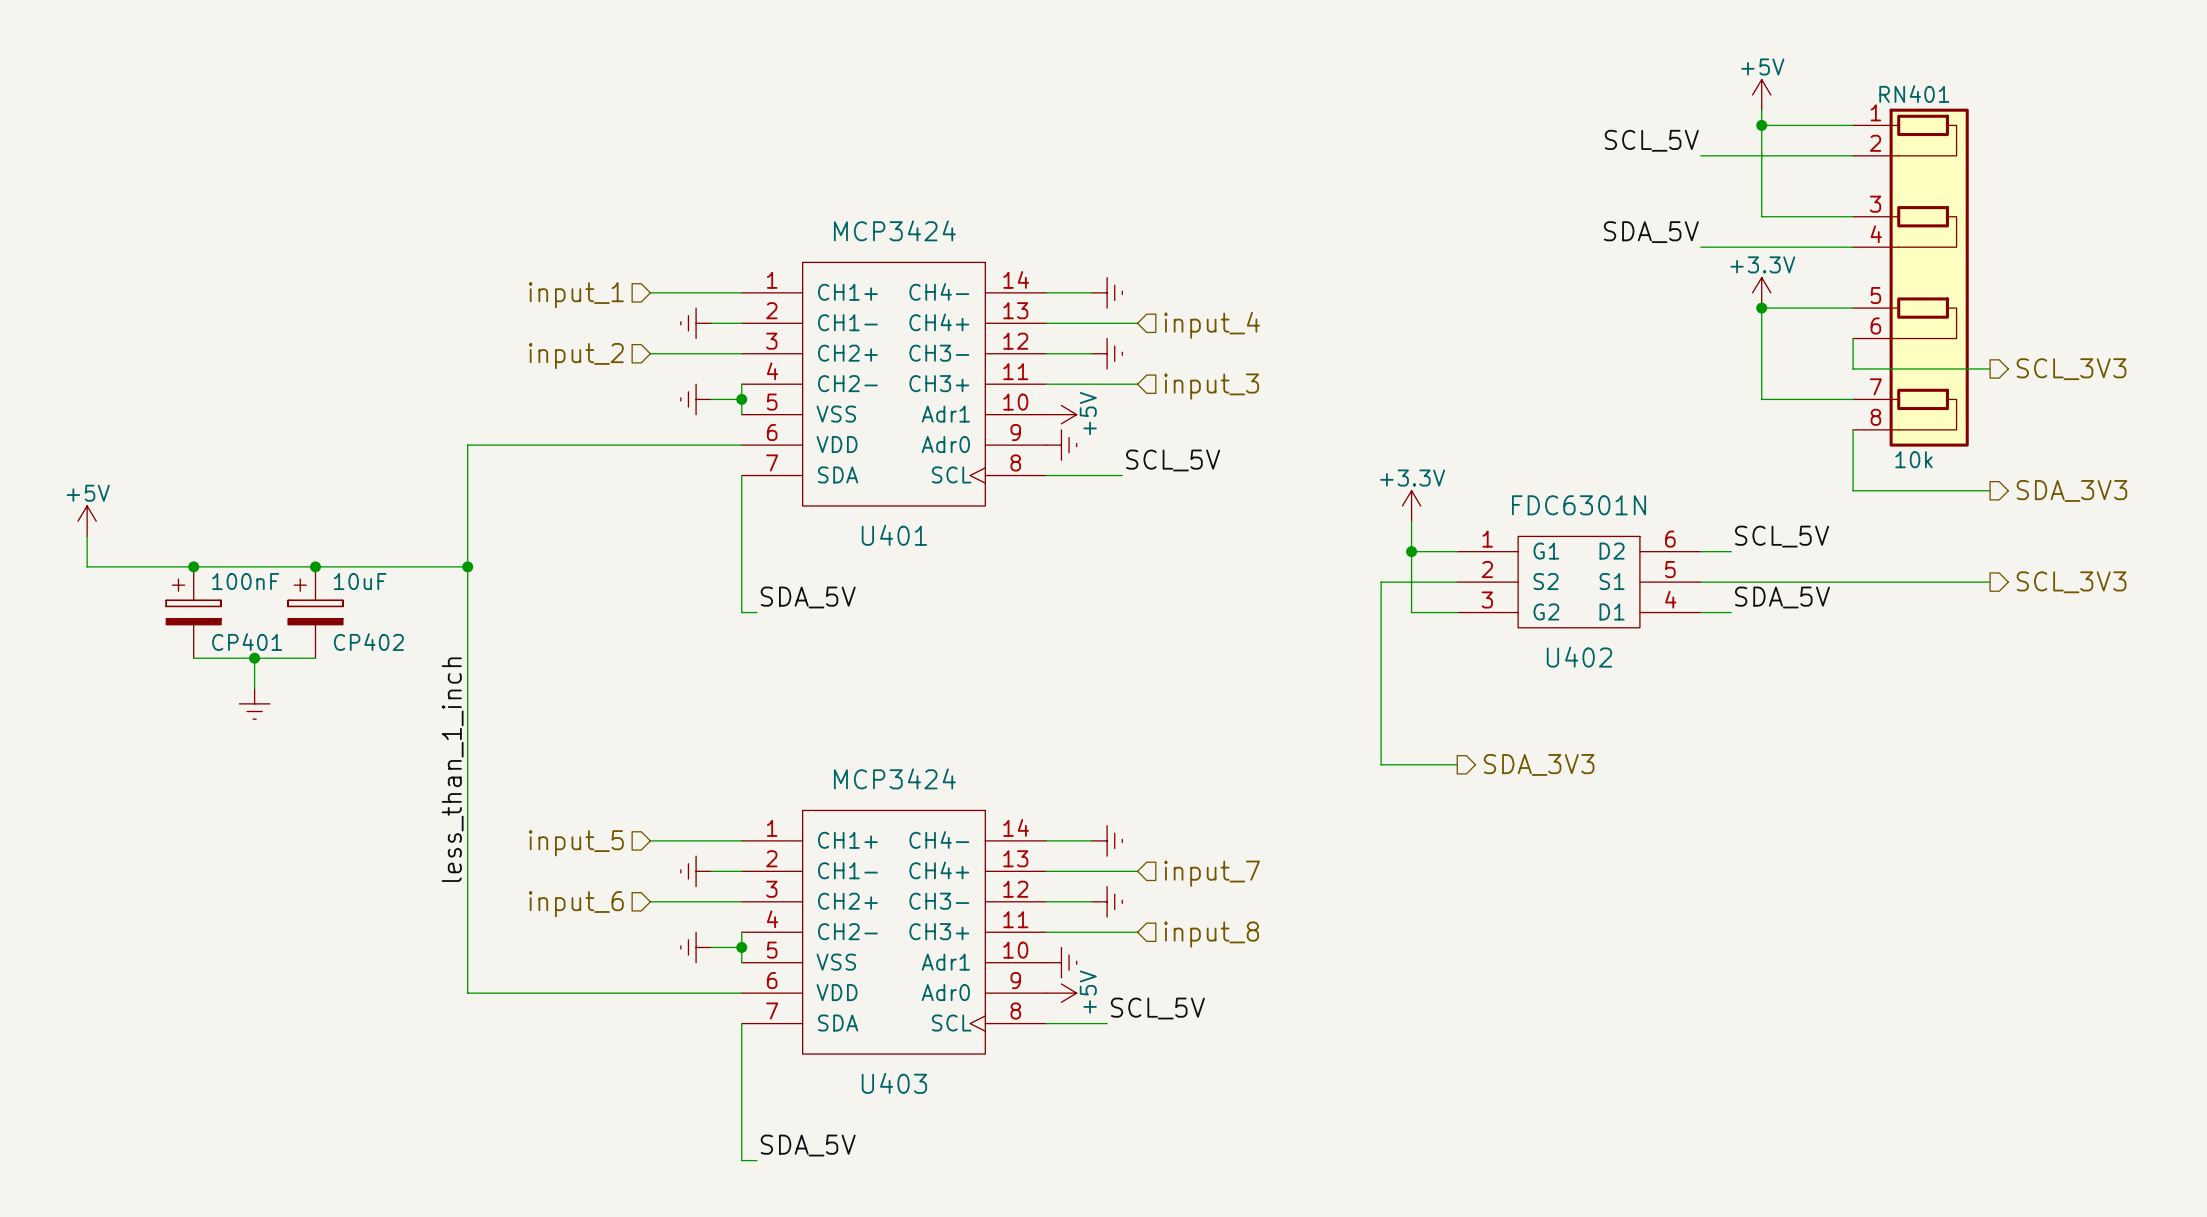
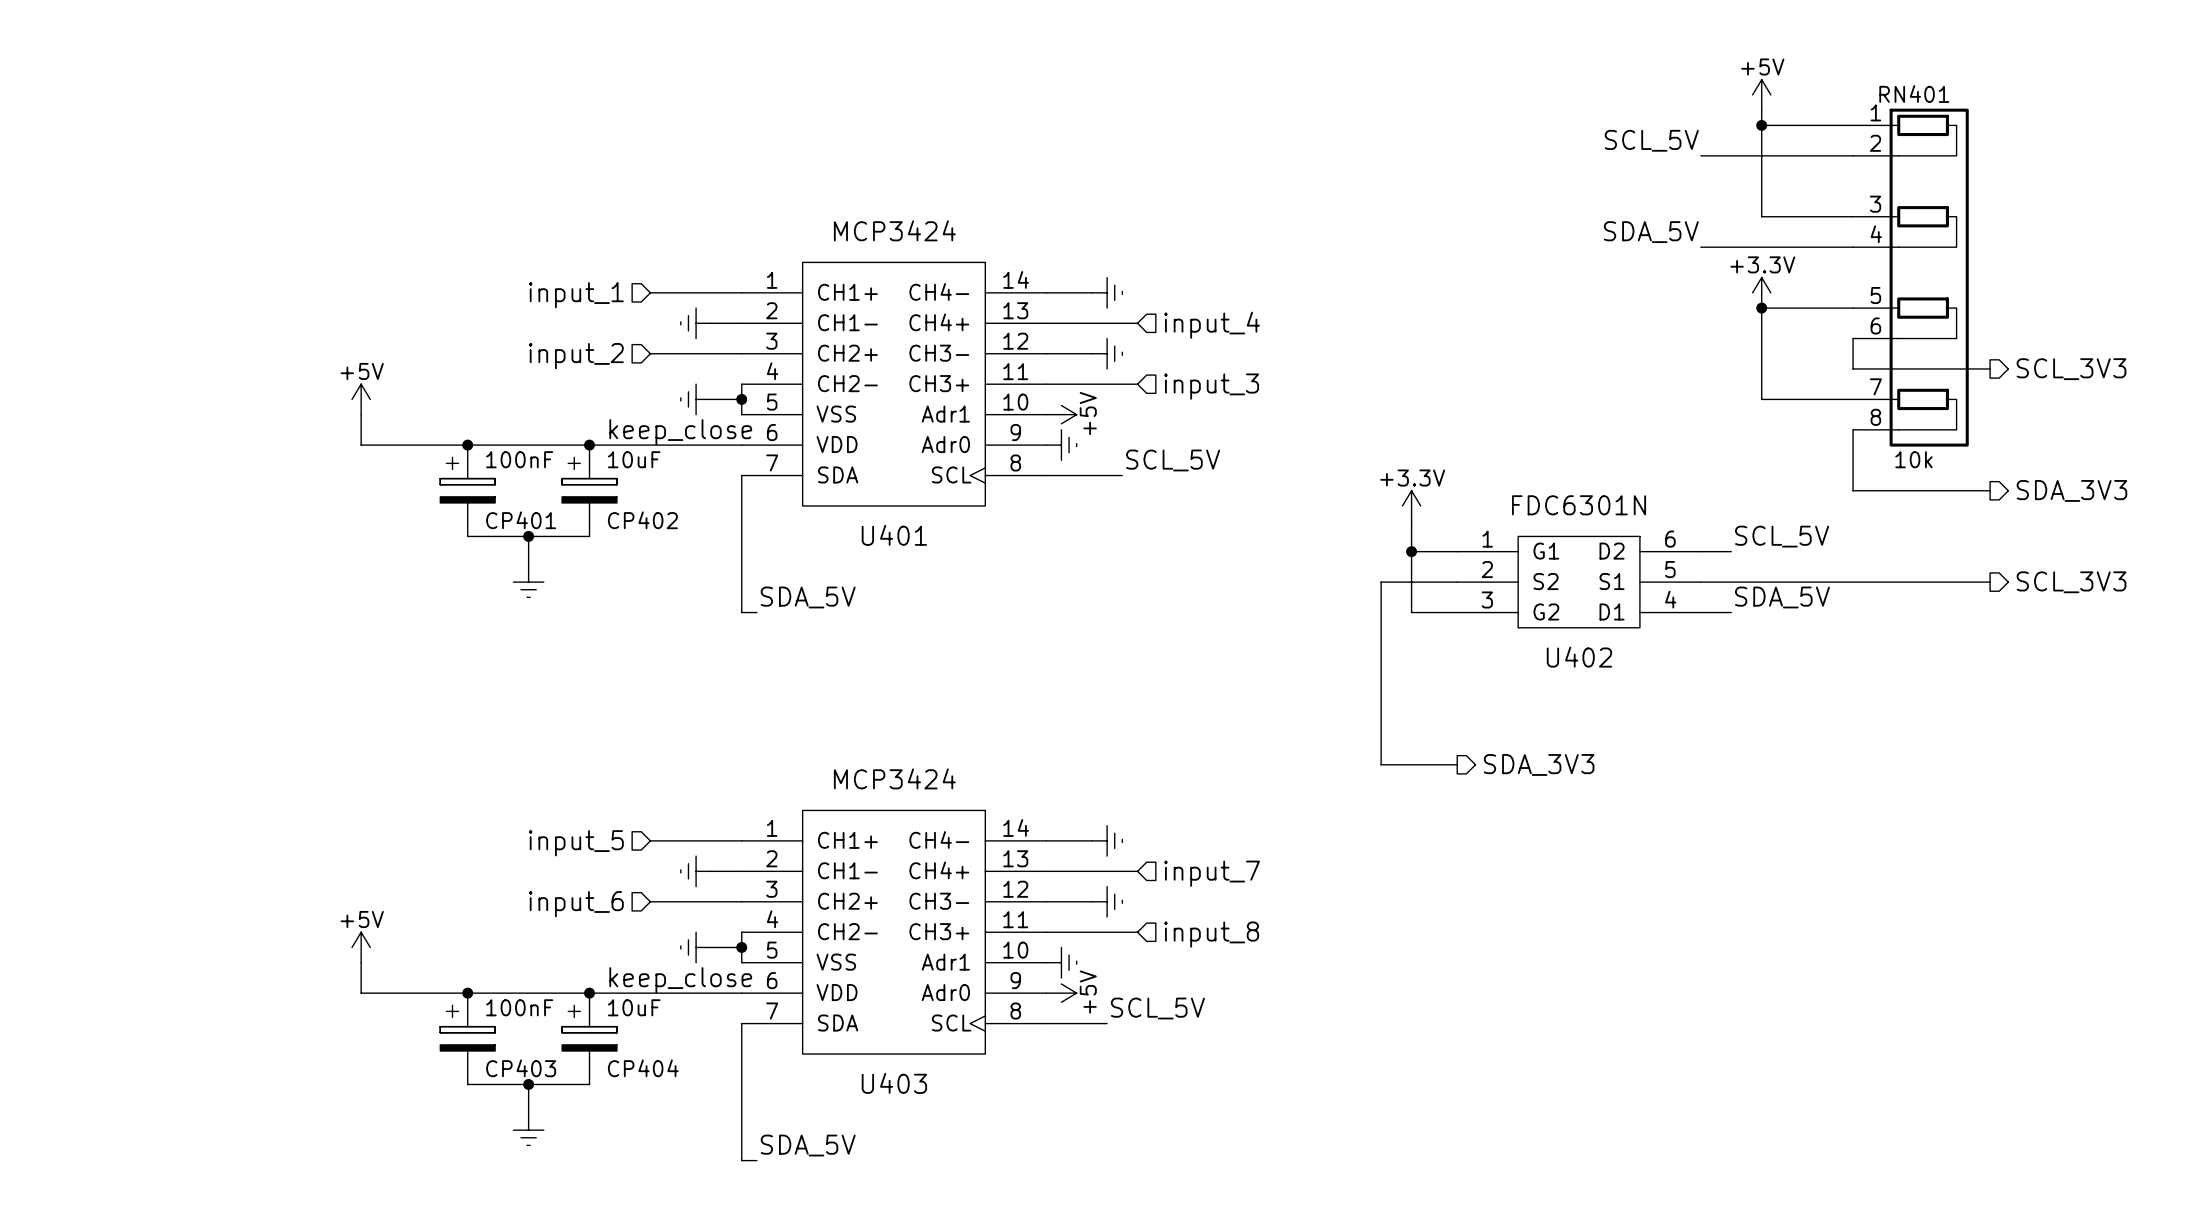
power symbol: none -> +5V (361, 399)
wire: none -> (361, 414) (361, 445) (467, 445)
label: none -> keep_close (680, 432)
wire: (467, 445) (467, 993) -> (361, 962) (361, 993) (467, 993)
junction: none -> (467, 445)
junction: none -> (589, 445)
power symbol: +5V (87, 521) -> none
wire: (87, 536) (87, 566) (467, 566) -> none
wire: none -> (467, 536) (589, 536)
wire: none -> (528, 536) (528, 566)
junction: none -> (528, 536)
junction: (193, 566) -> none
junction: (315, 566) -> none
junction: (467, 566) -> none
power symbol: none -> (528, 582)
CP401 position: (193, 612) -> (467, 490)
CP402 position: (315, 612) -> (589, 490)
wire: (193, 658) (315, 658) -> none
wire: (254, 658) (254, 688) -> none
junction: (254, 658) -> none
power symbol: (254, 703) -> none
label: less_than_1_inch (452, 769) -> none
power symbol: none -> +5V (361, 947)
label: none -> keep_close (680, 980)
junction: none -> (467, 993)
junction: none -> (589, 993)
CP403: none -> 100nF (467, 1038)
CP404: none -> 10uF (589, 1038)
wire: none -> (467, 1084) (589, 1084)
wire: none -> (528, 1084) (528, 1114)
junction: none -> (528, 1084)
power symbol: none -> (528, 1130)

